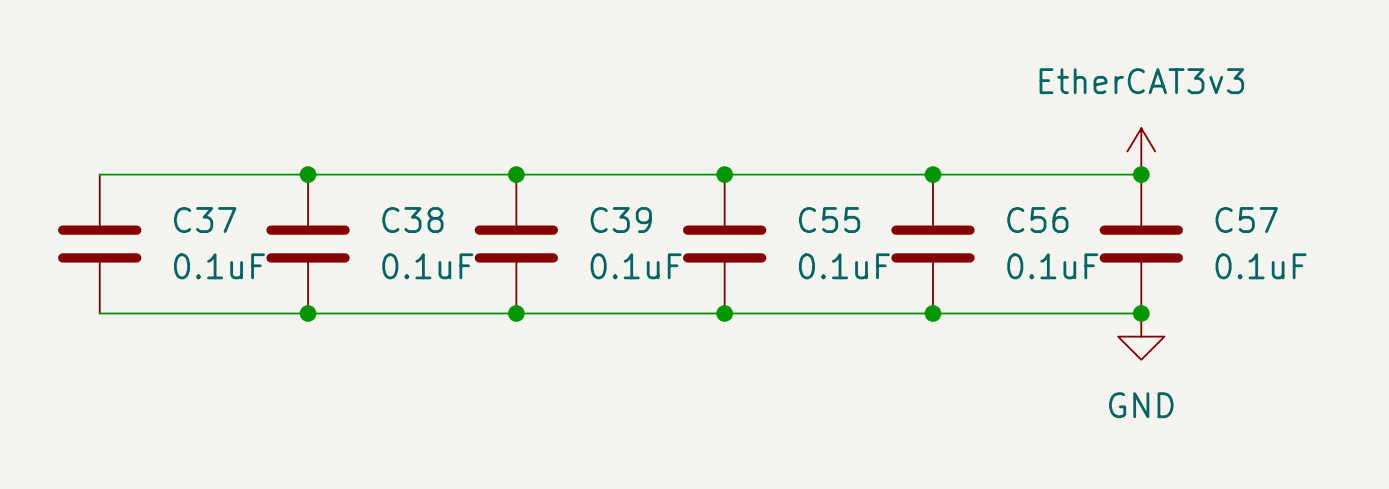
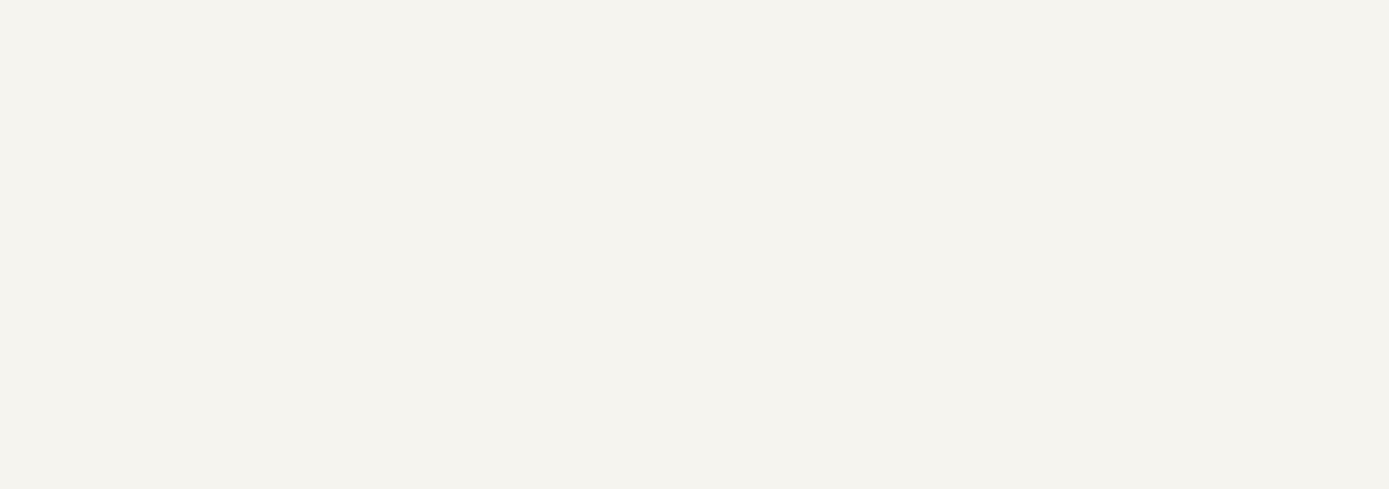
power symbol: EtherCAT3v3 (1141, 151) -> none
wire: (99, 174) (1141, 174) -> none
junction: (308, 174) -> none
junction: (516, 174) -> none
junction: (724, 174) -> none
junction: (932, 174) -> none
junction: (1141, 174) -> none
C37: 0.1uF (99, 244) -> none
C38: 0.1uF (308, 244) -> none
C39: 0.1uF (516, 244) -> none
C55: 0.1uF (724, 244) -> none
C56: 0.1uF (932, 244) -> none
C57: 0.1uF (1141, 244) -> none
wire: (99, 313) (1141, 313) -> none
junction: (308, 313) -> none
junction: (516, 313) -> none
junction: (724, 313) -> none
junction: (932, 313) -> none
junction: (1141, 313) -> none
power symbol: GND (1141, 336) -> none

